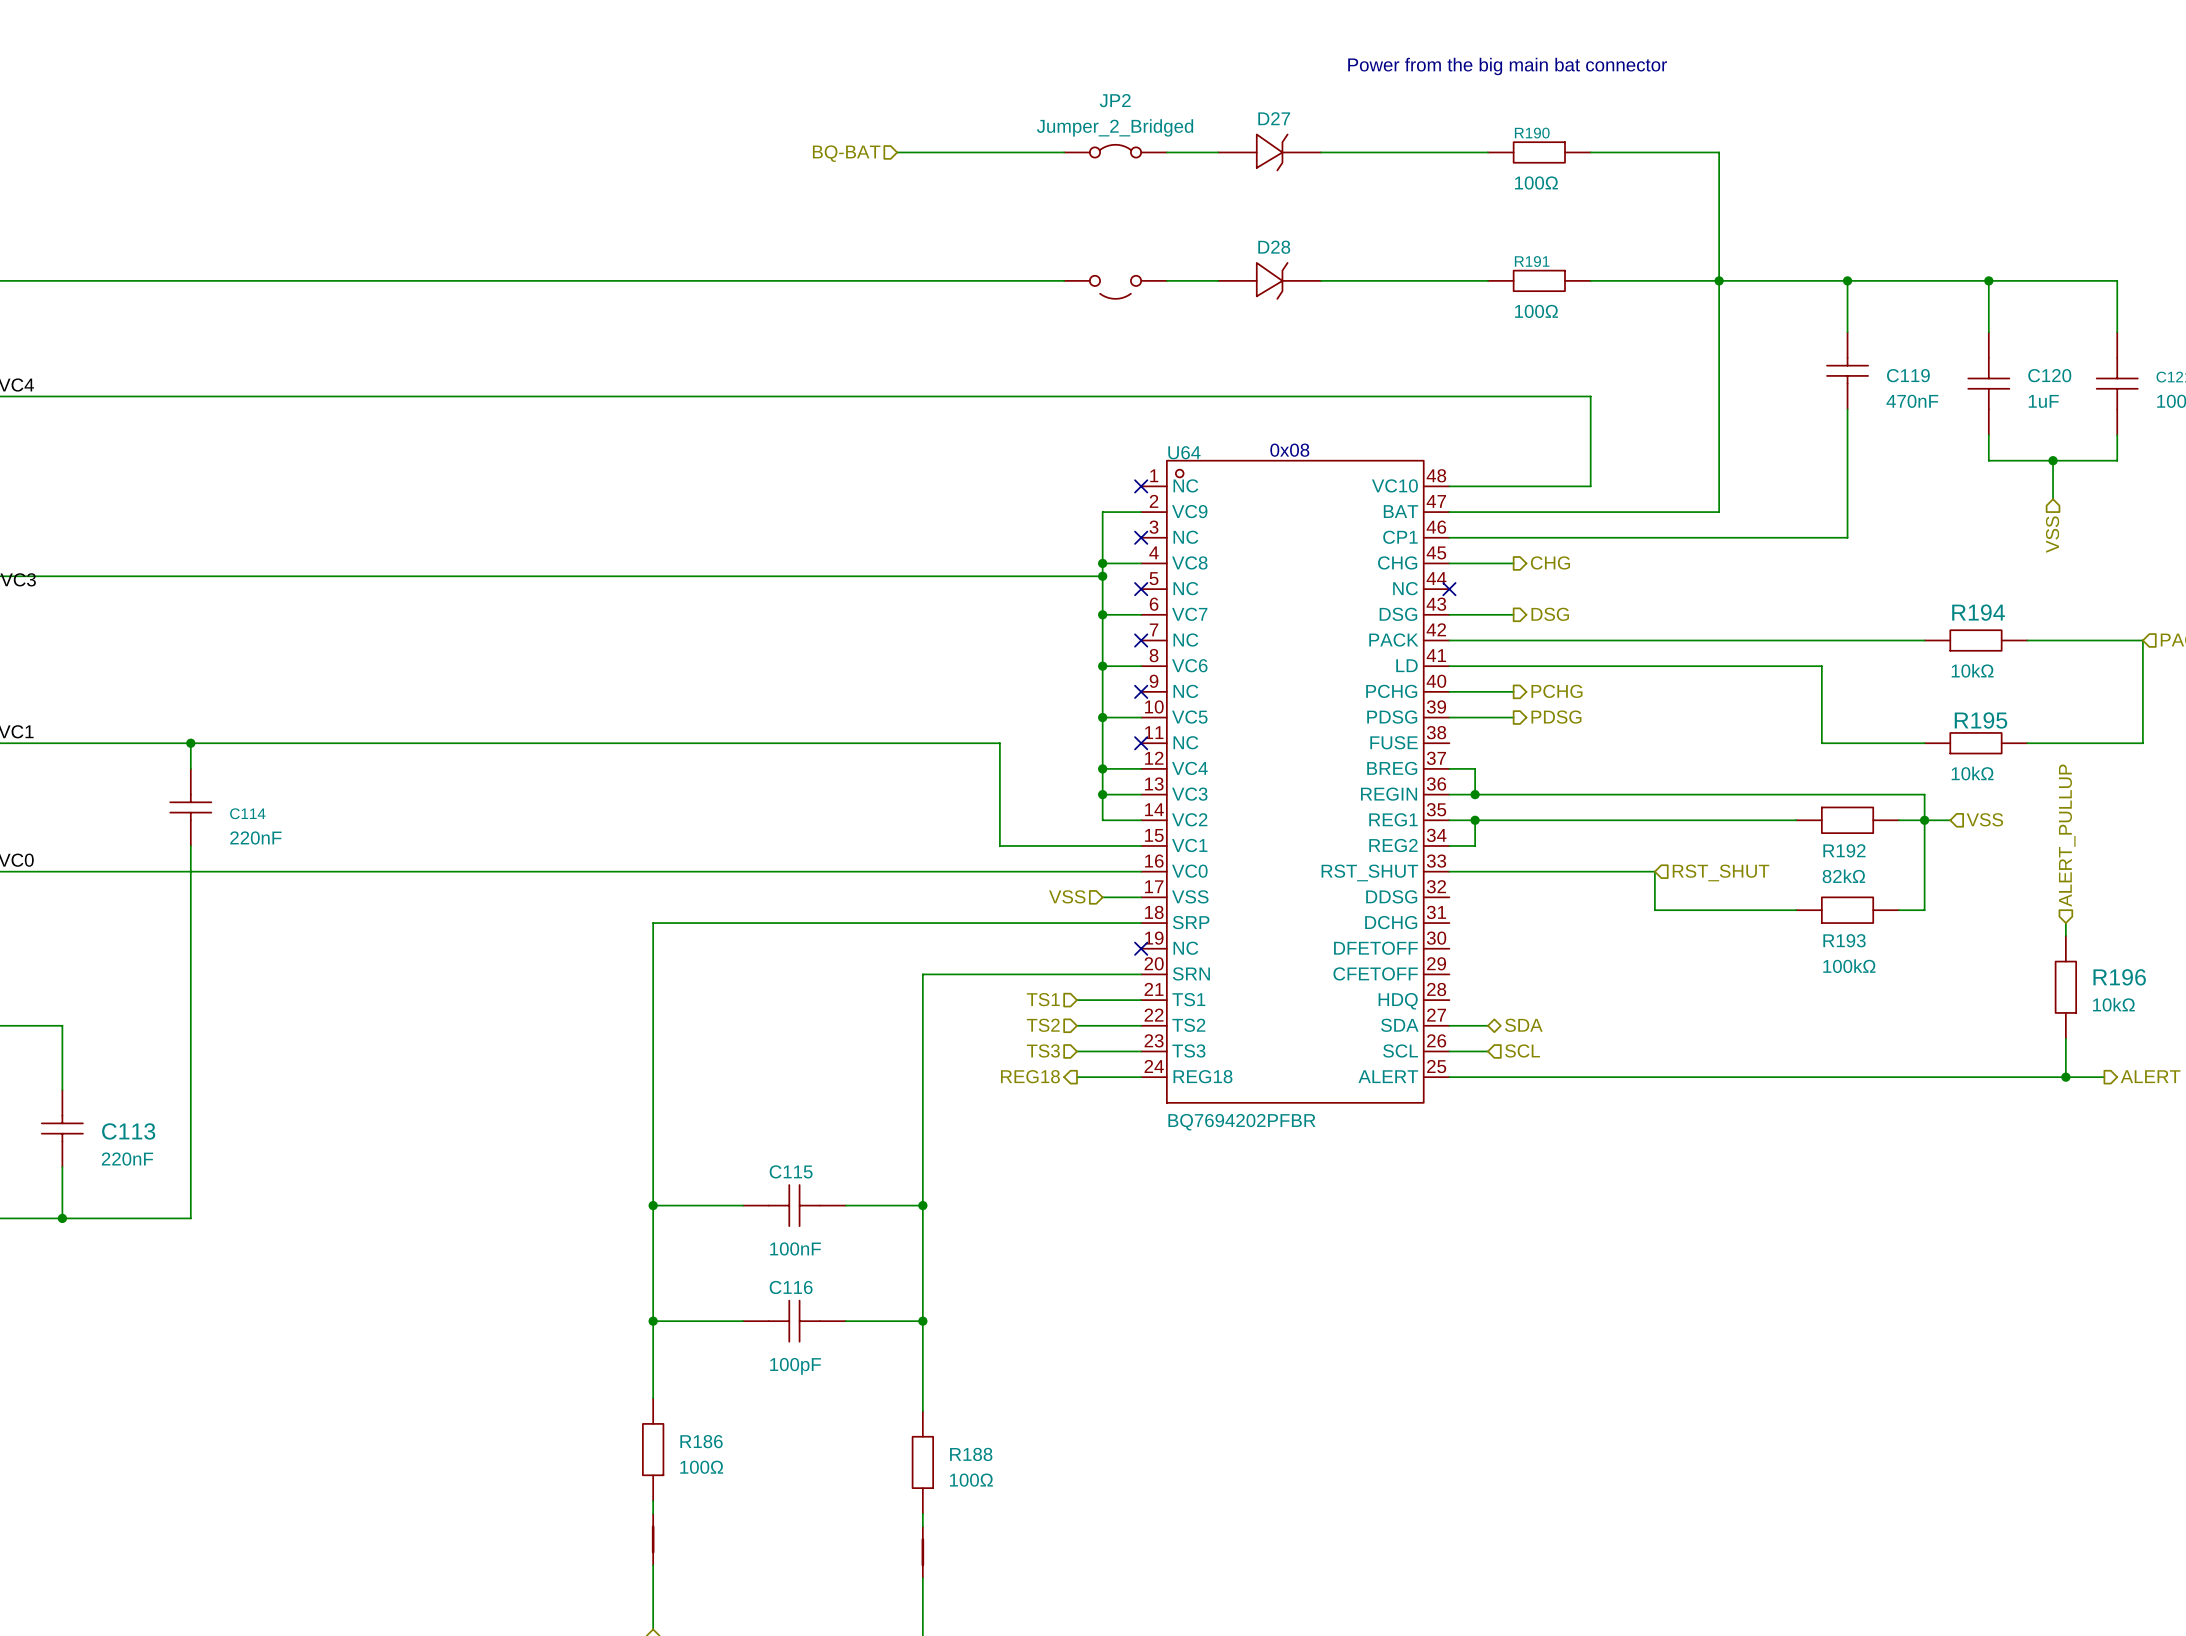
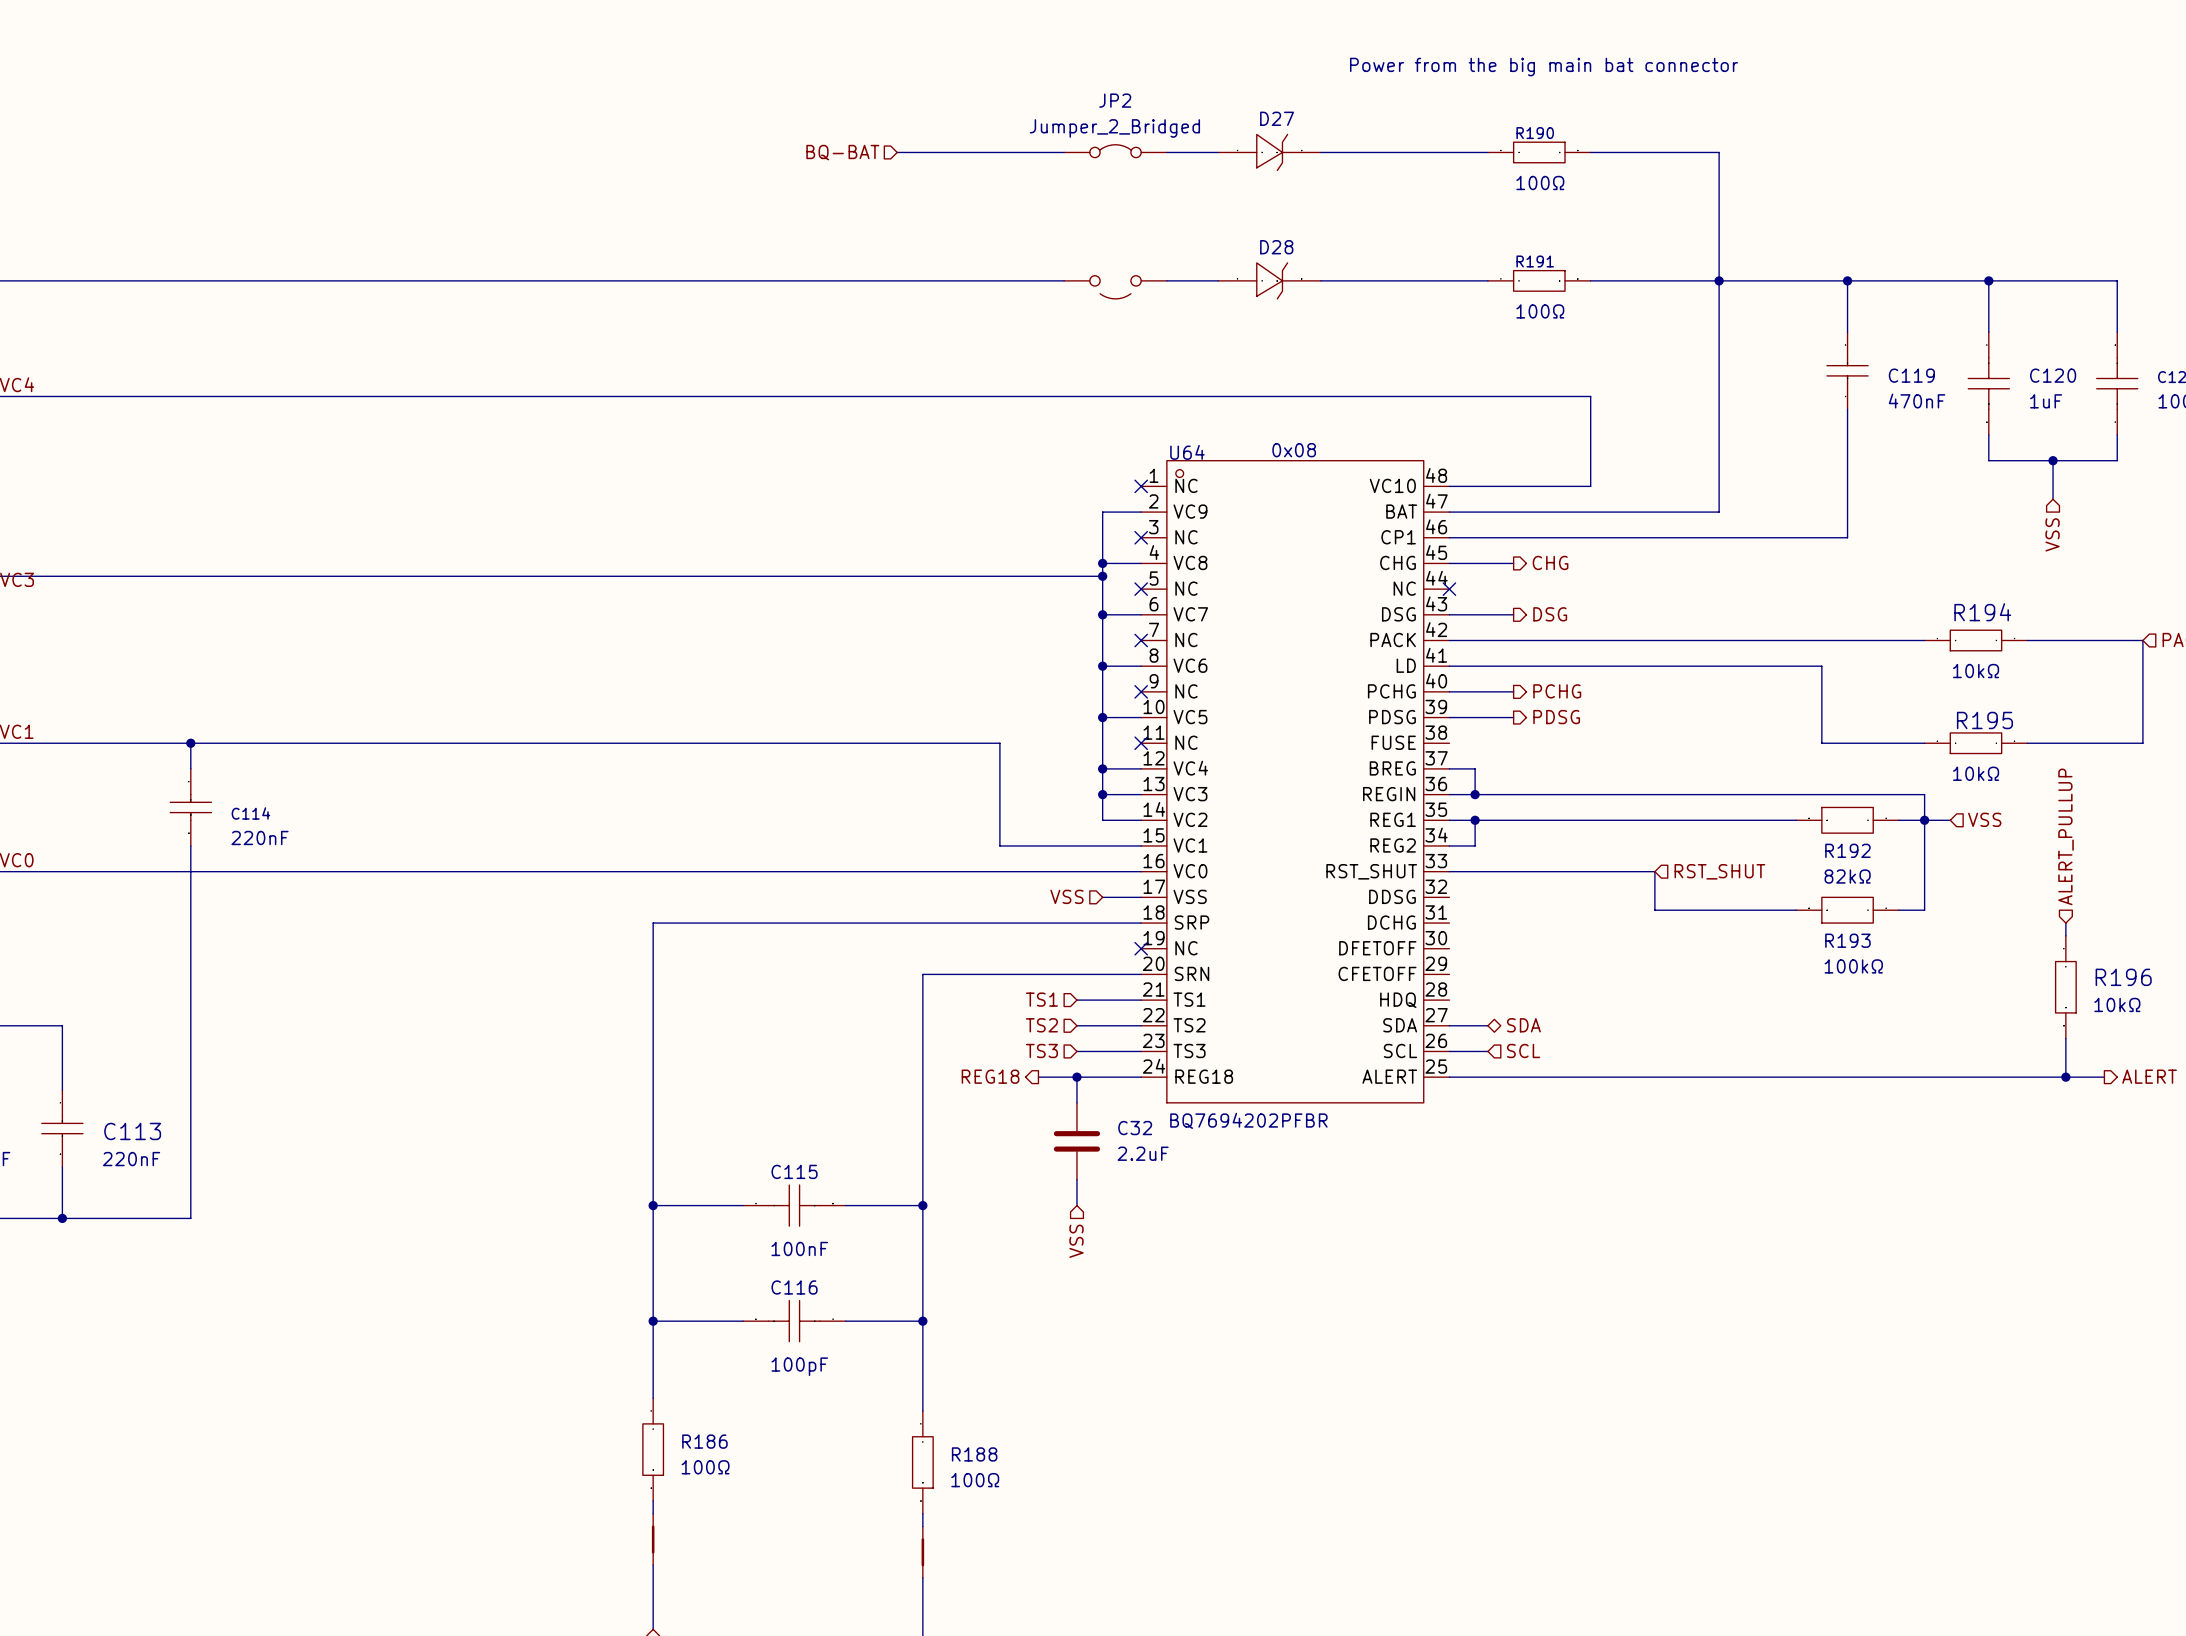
hierarchical label position: REG18 (1030, 1076) -> REG18 (990, 1076)
wire: none -> (1038, 1077) (1076, 1077) (1076, 1102)
junction: none -> (1076, 1077)
C32: none -> 2.2uF (1076, 1141)
wire: none -> (1076, 1179) (1076, 1205)
hierarchical label: none -> VSS (1076, 1241)

